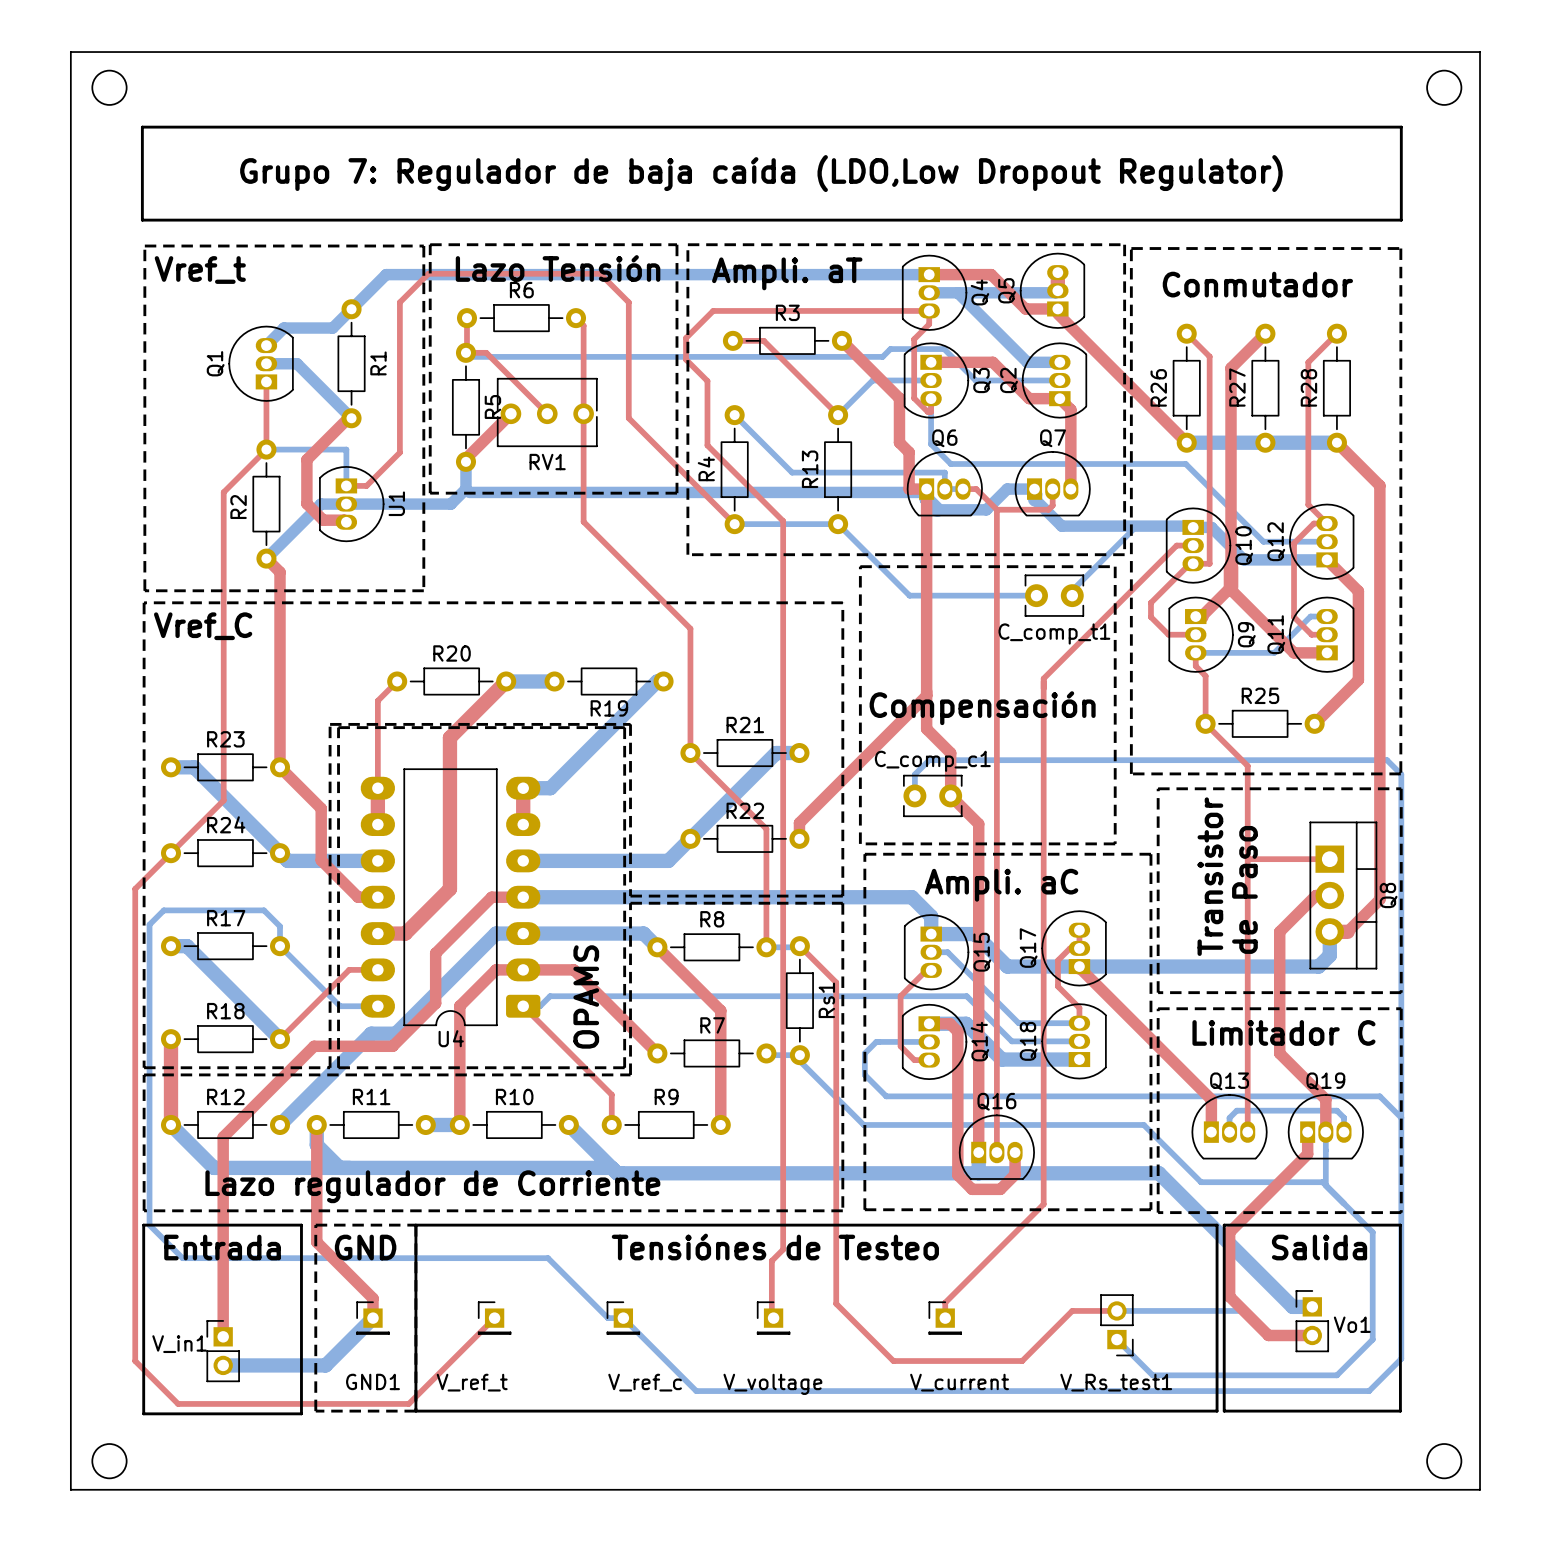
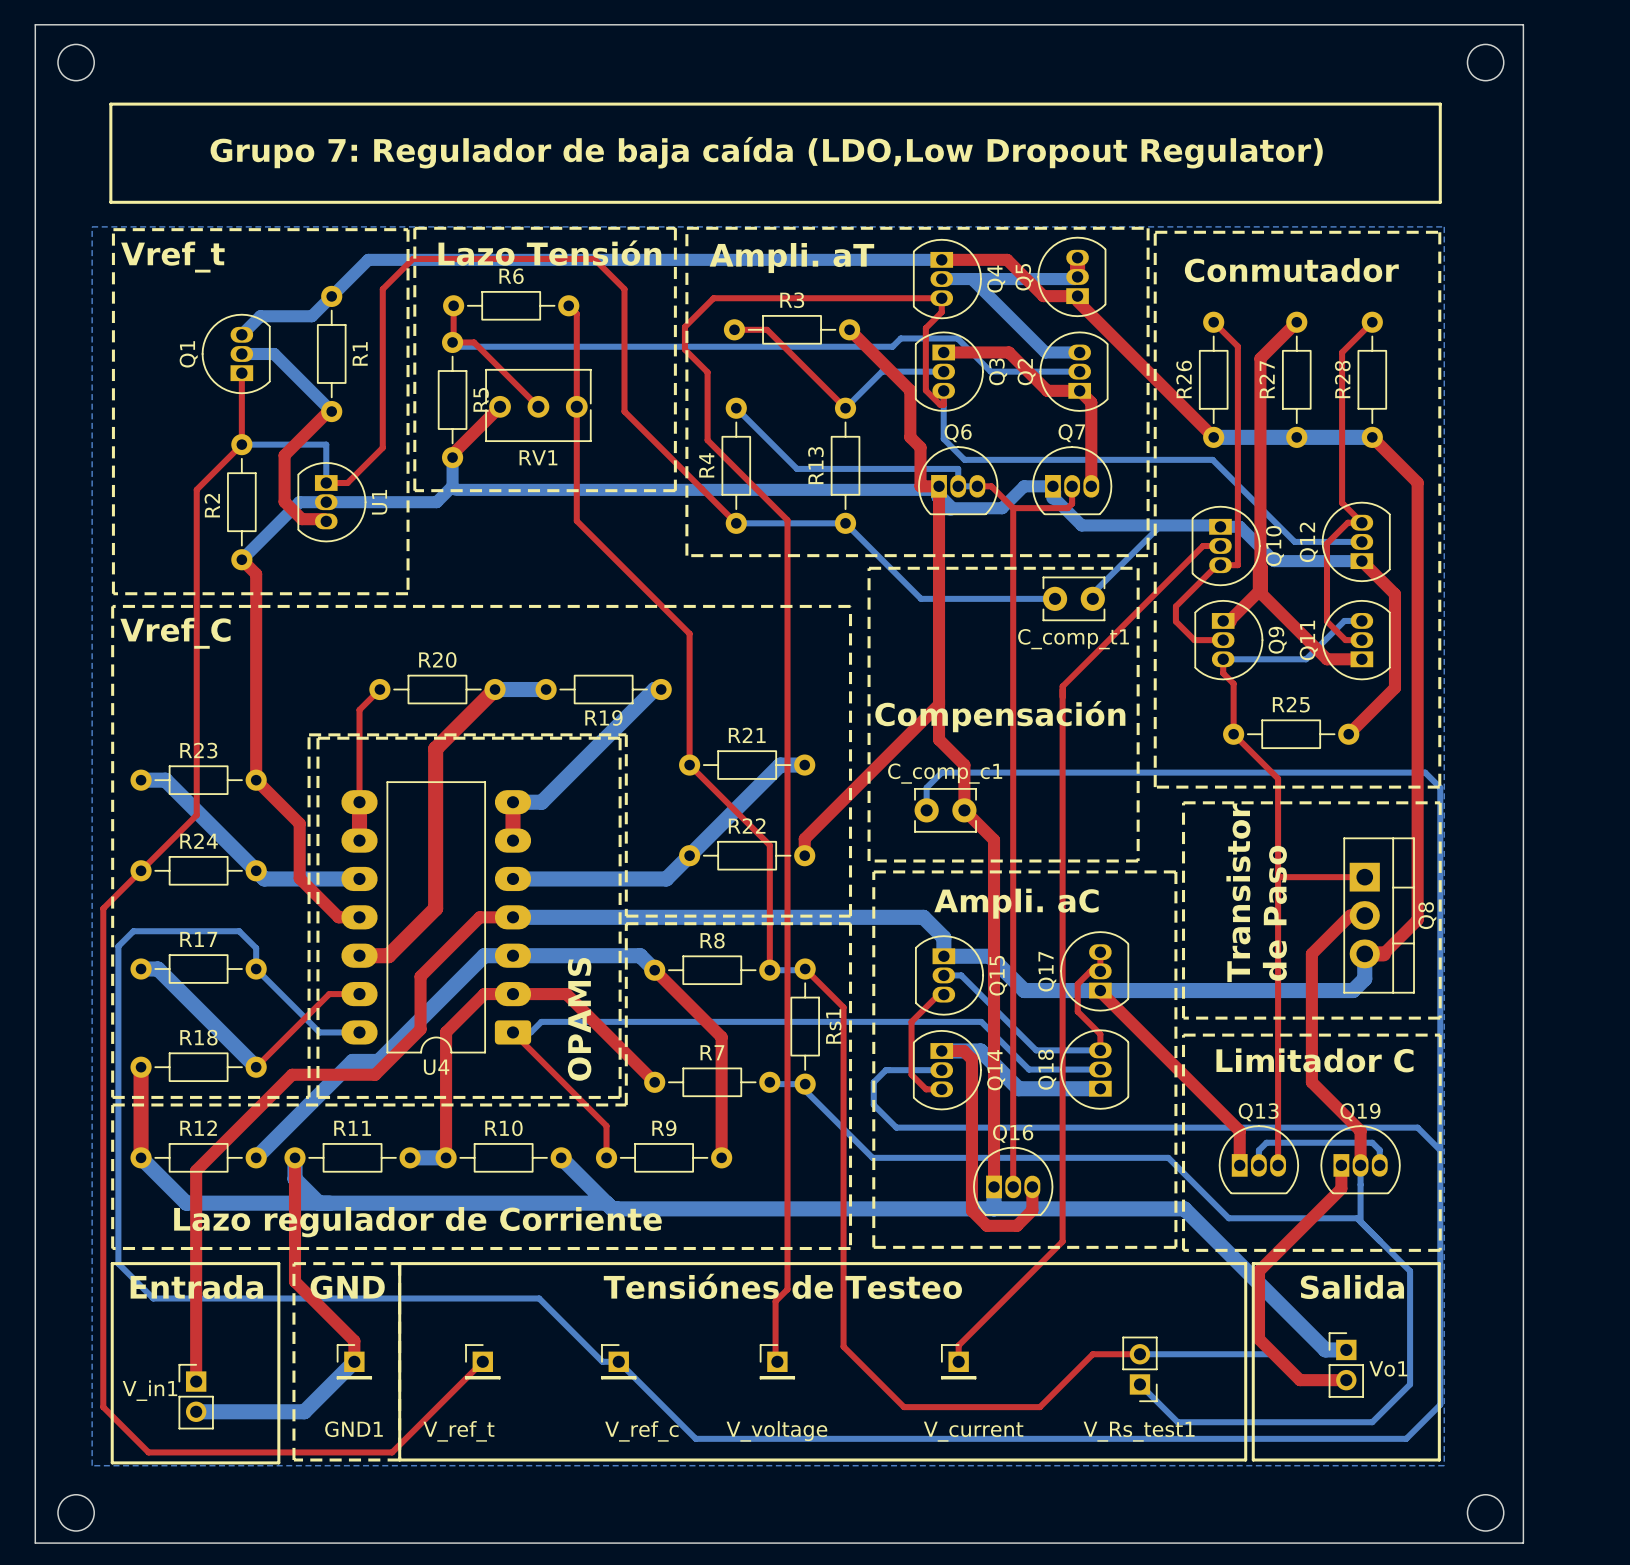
bottom zone outline: none -> (92, 226) (92, 1465) (1444, 1465) (1444, 226) (92, 226)

